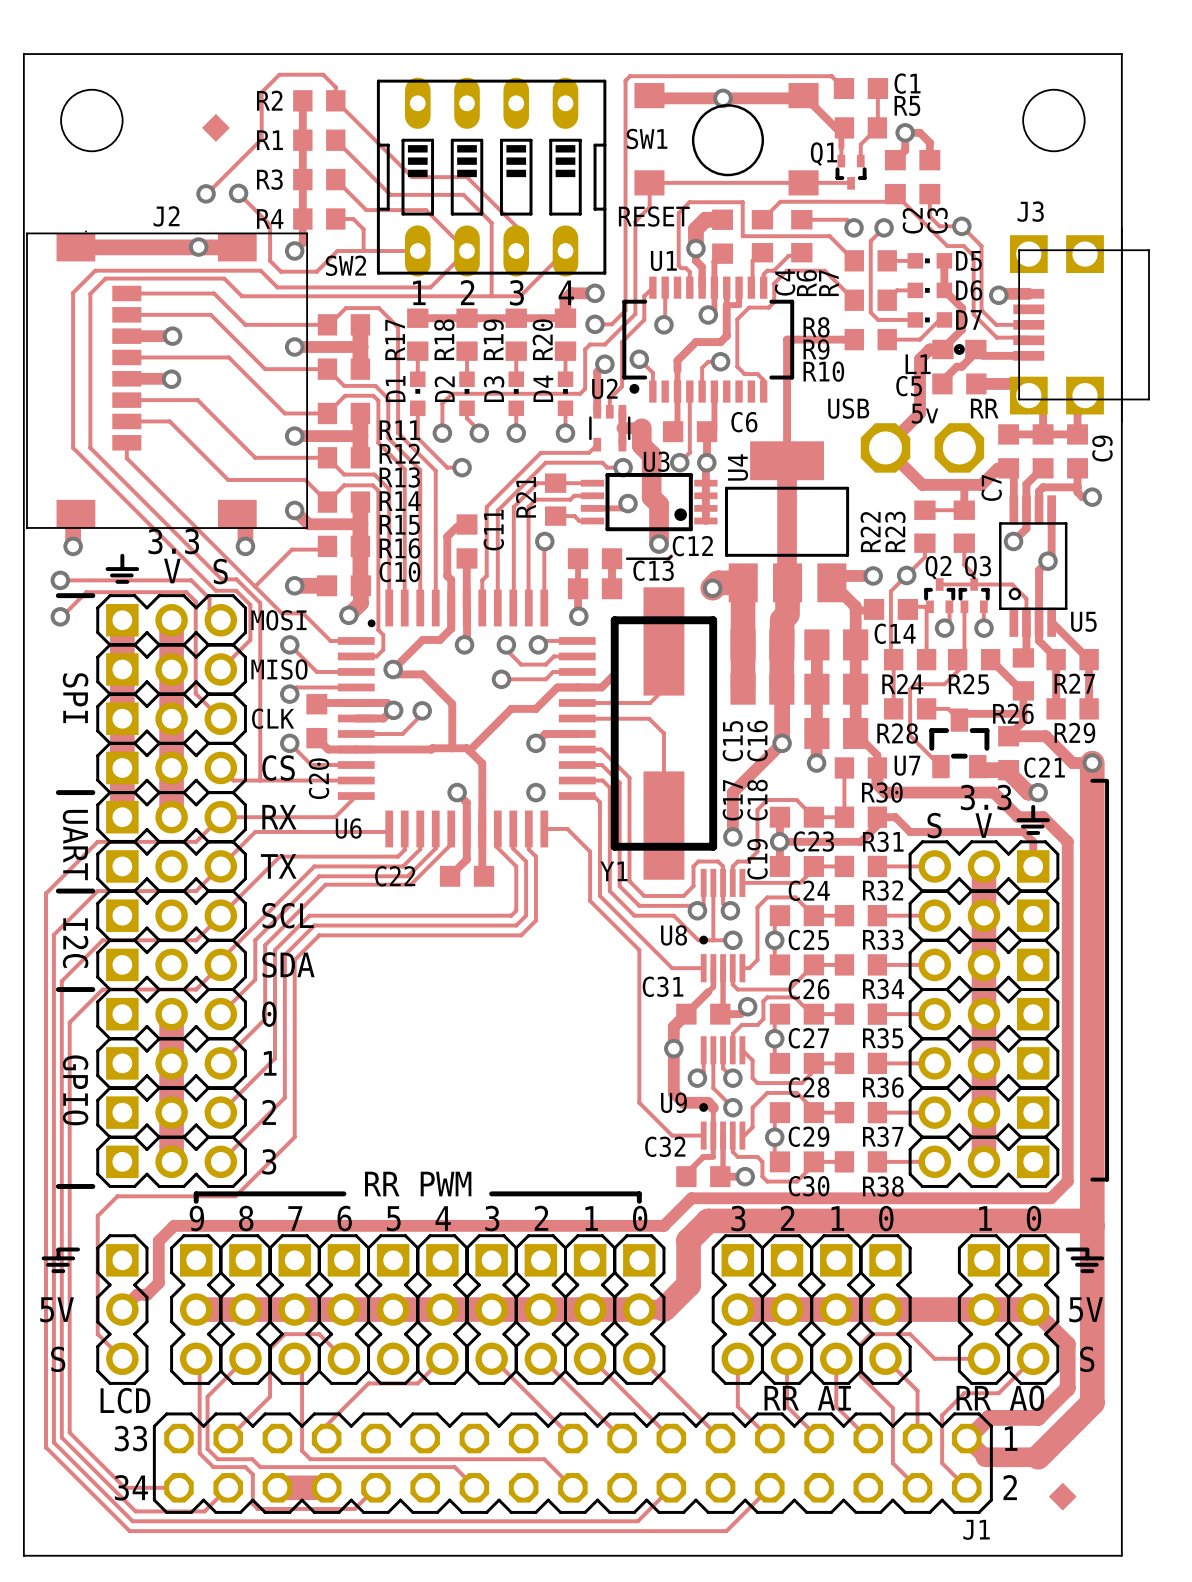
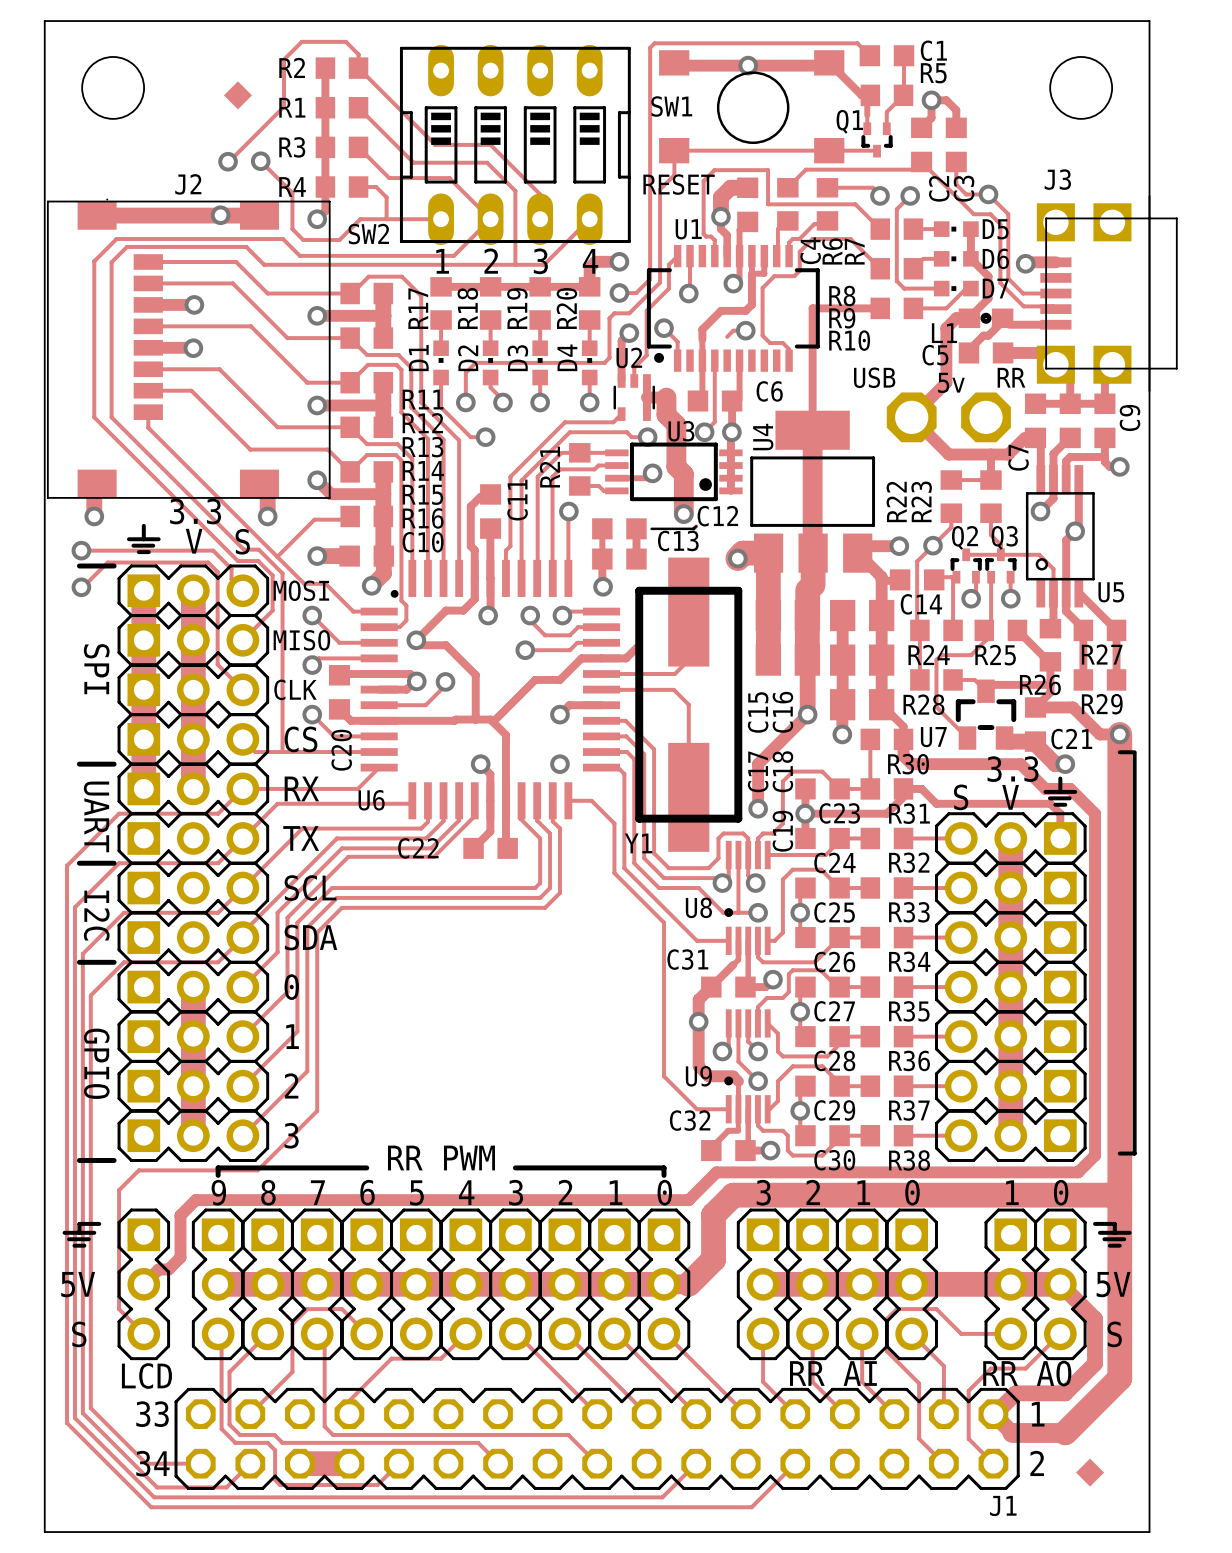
track: (702, 367) (702, 391) -> none

